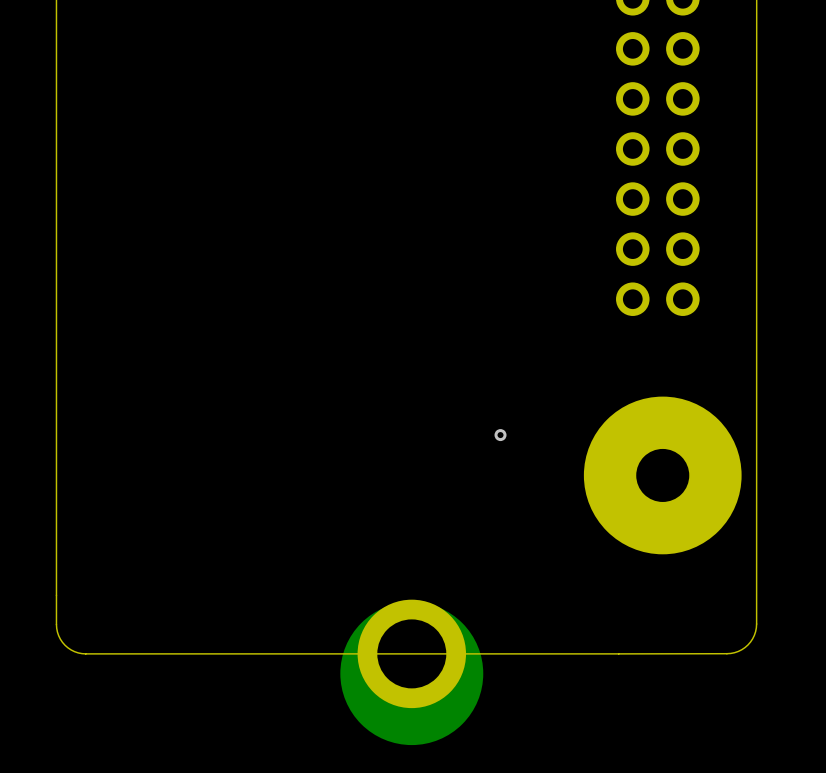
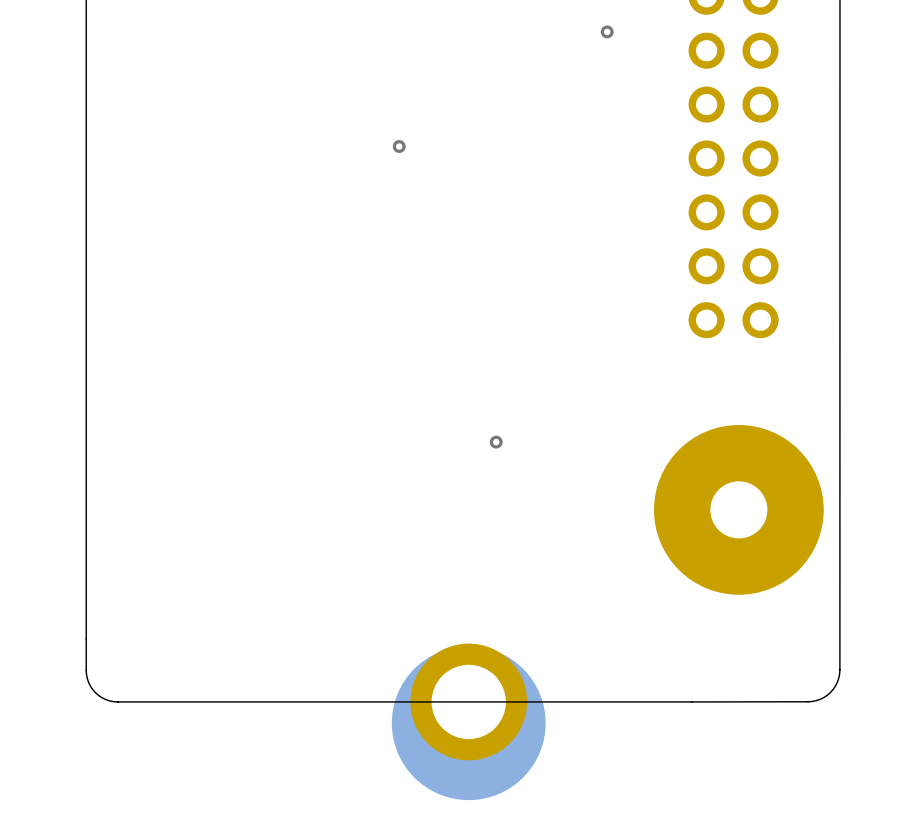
via: none -> (607, 31)
via: none -> (399, 146)
via position: (500, 435) -> (496, 442)

